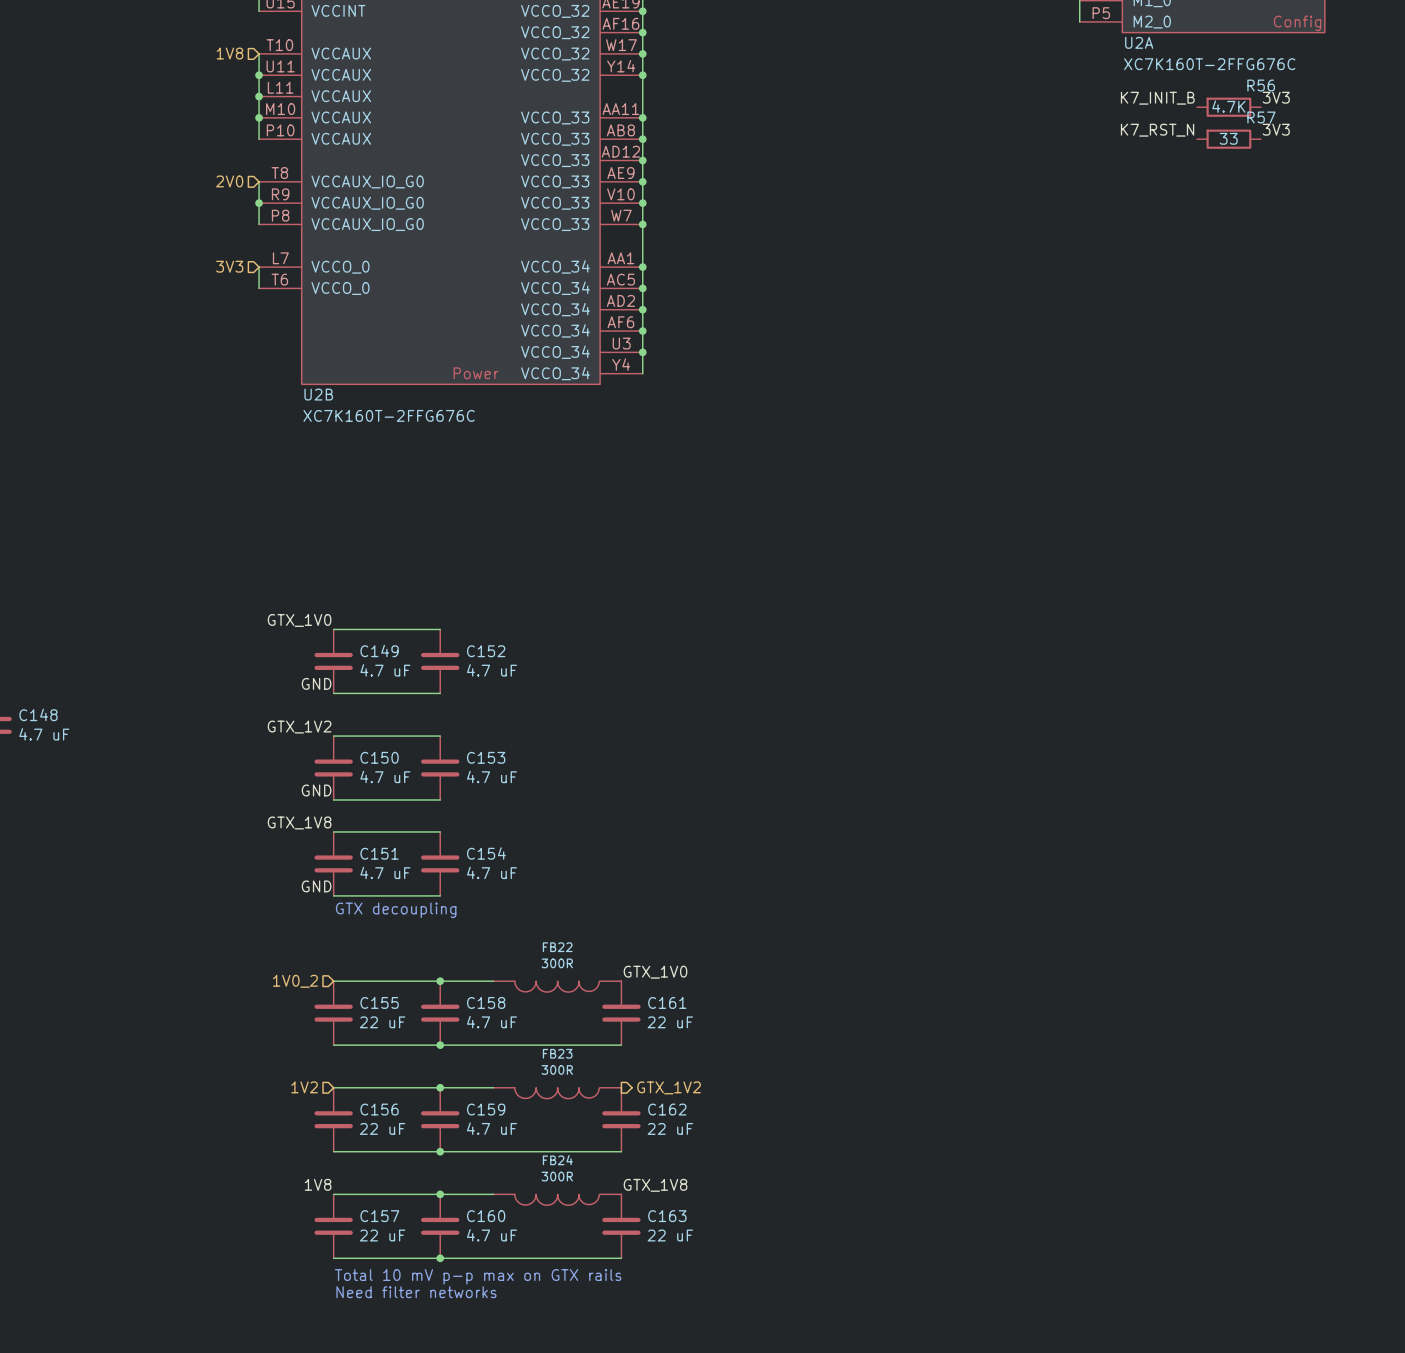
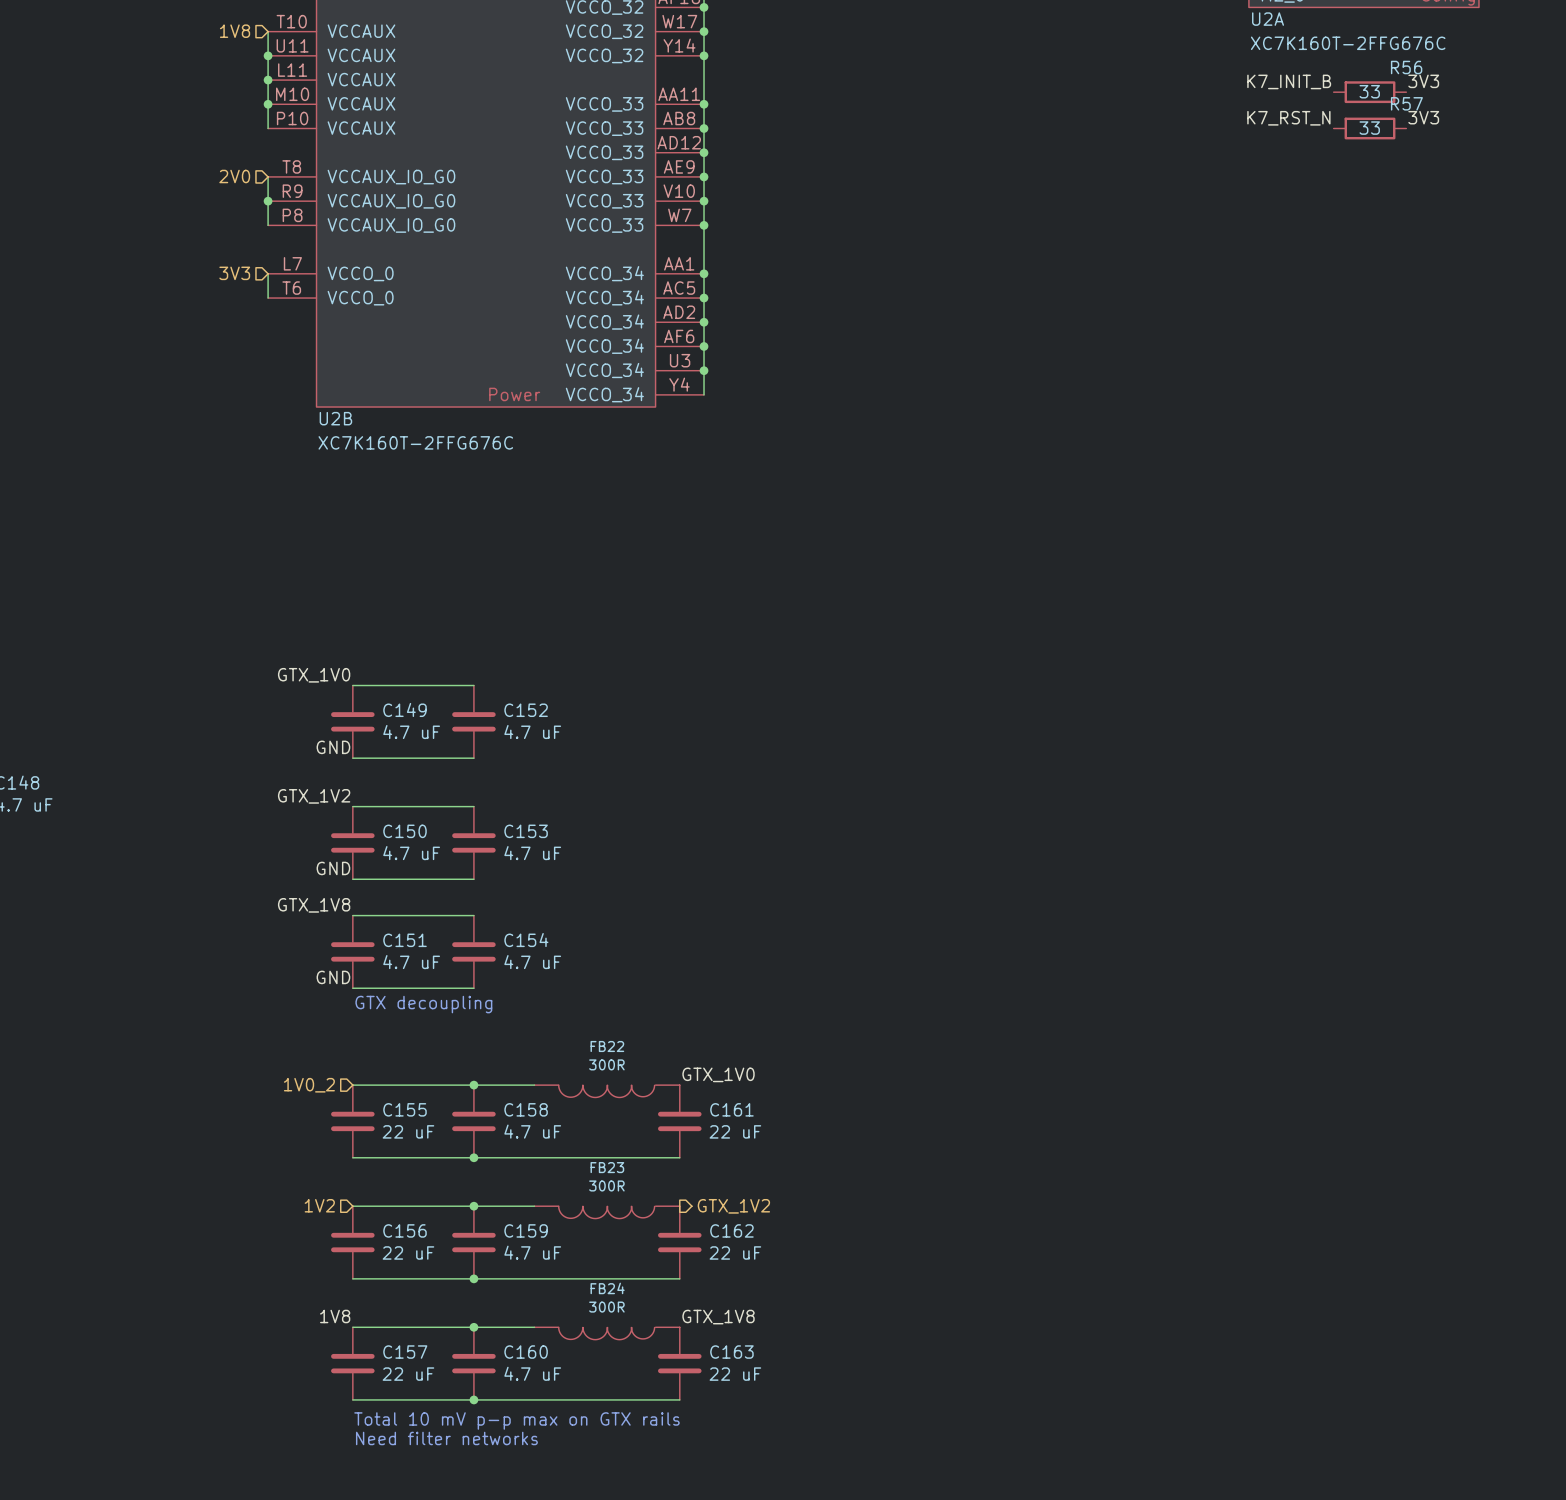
R56 value: 4.7K (1228, 106) -> 33 (1369, 91)

